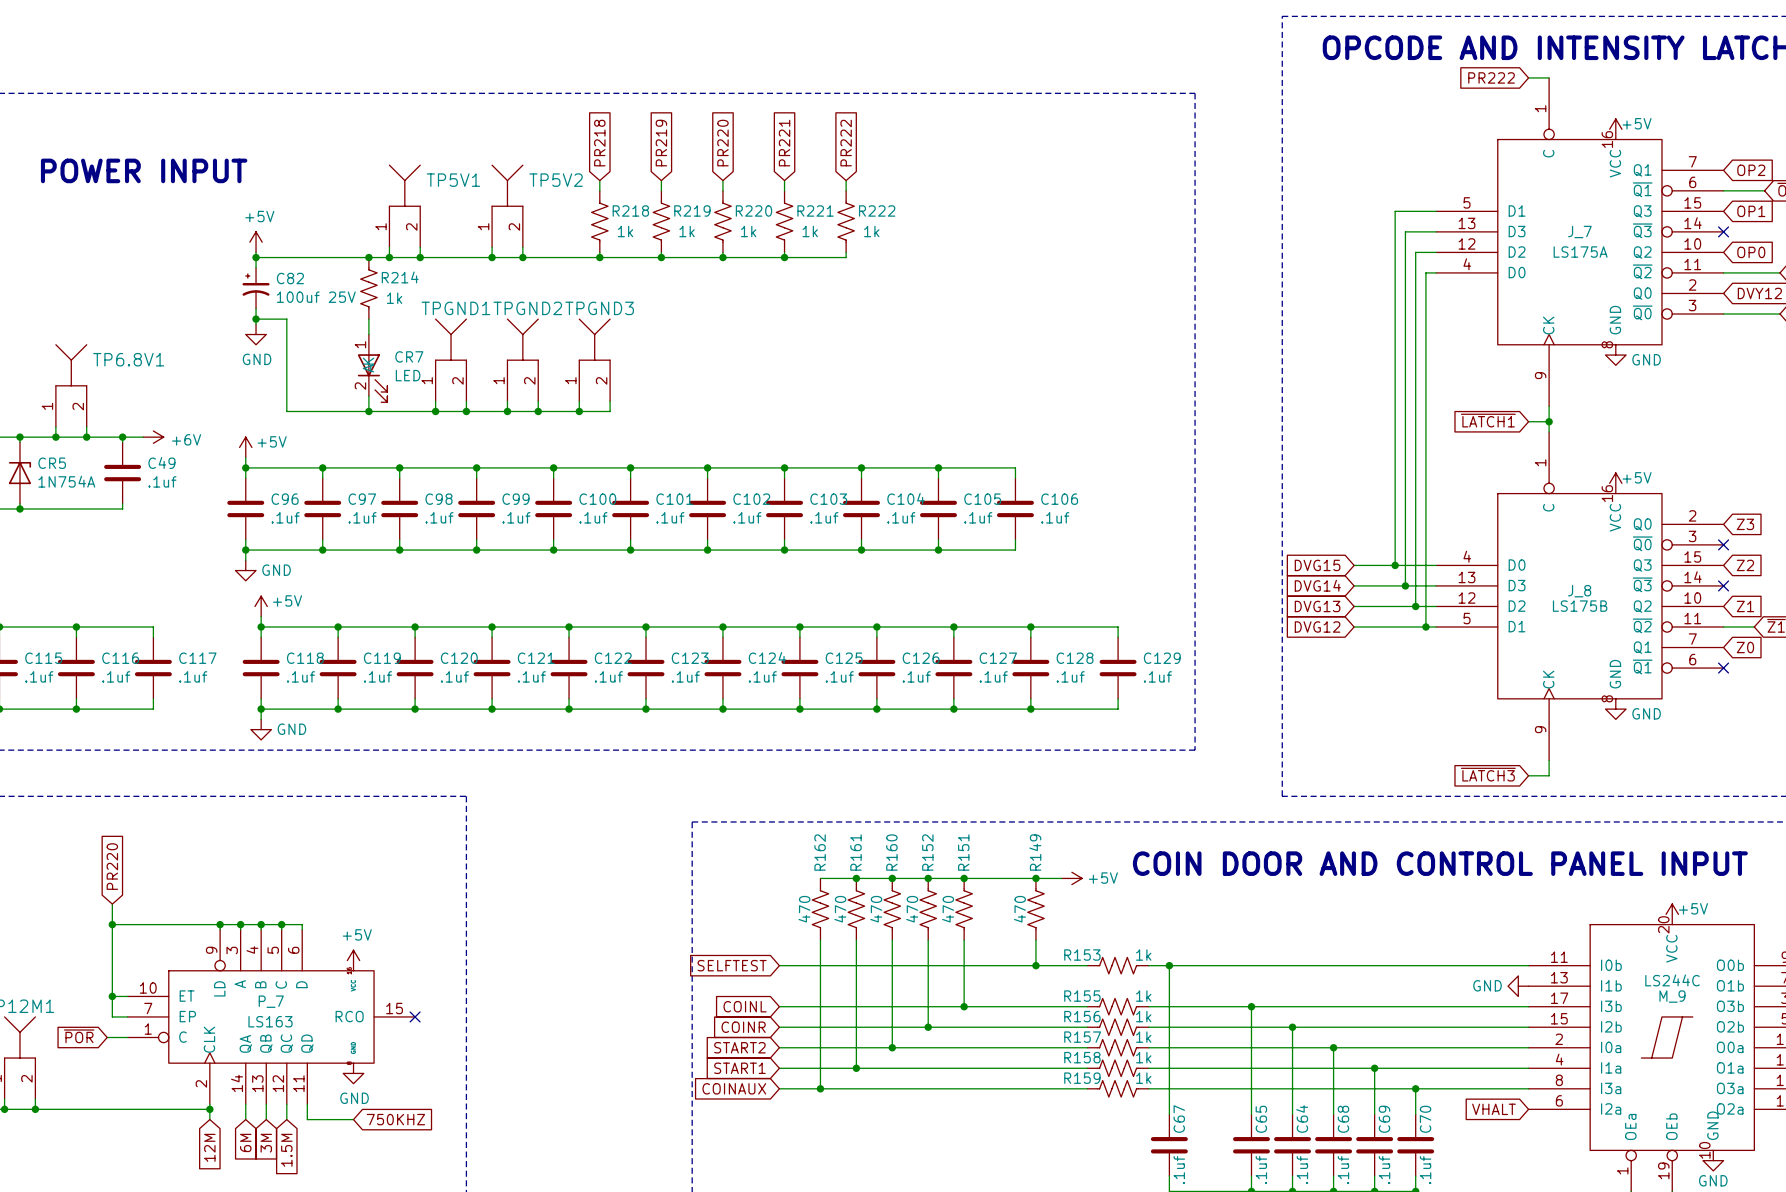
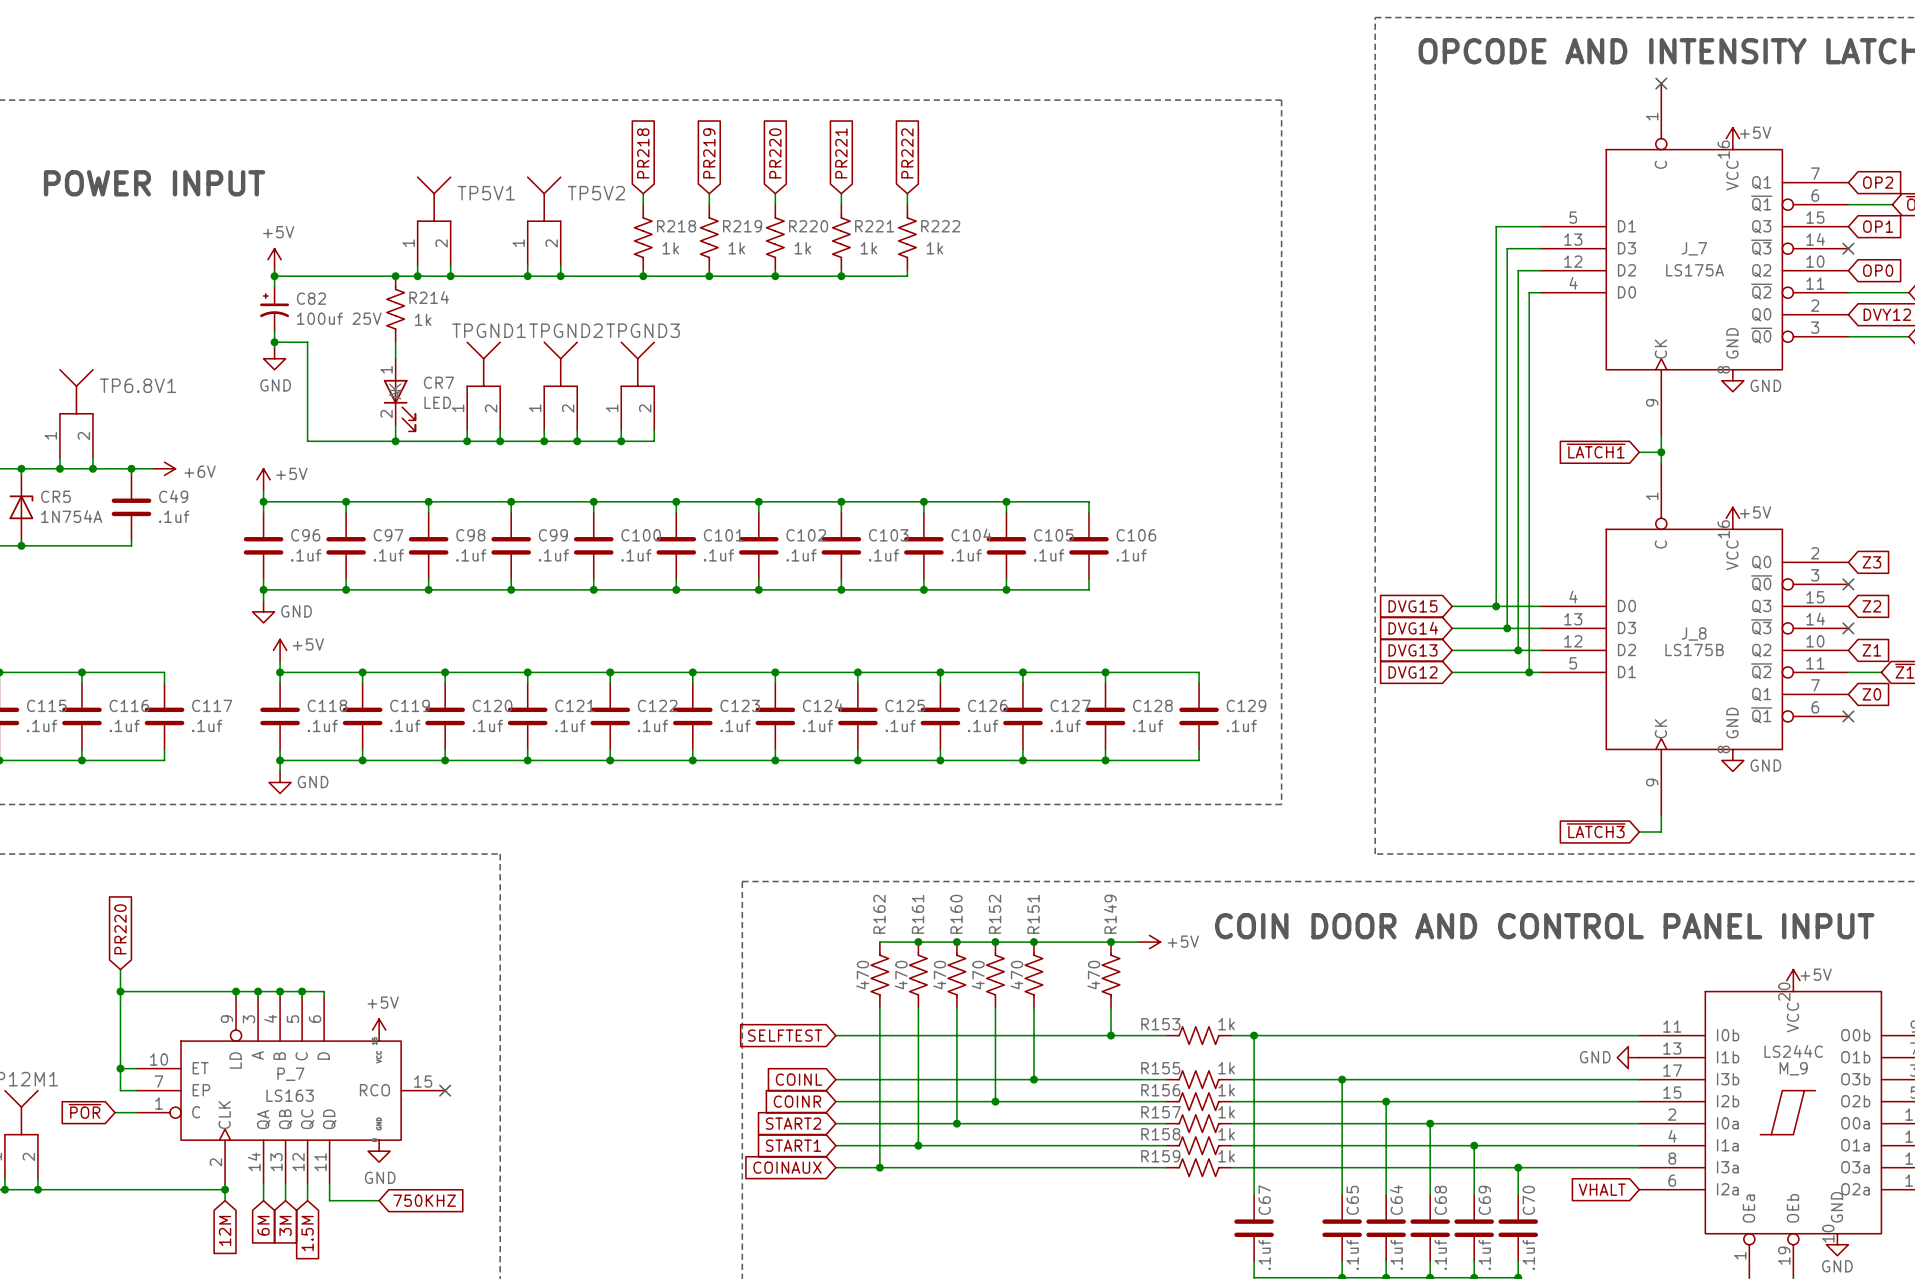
global label: PR222 (1491, 77) -> none
wire: (1528, 77) (1549, 77) -> none
no-connect mark: none -> (1661, 83)

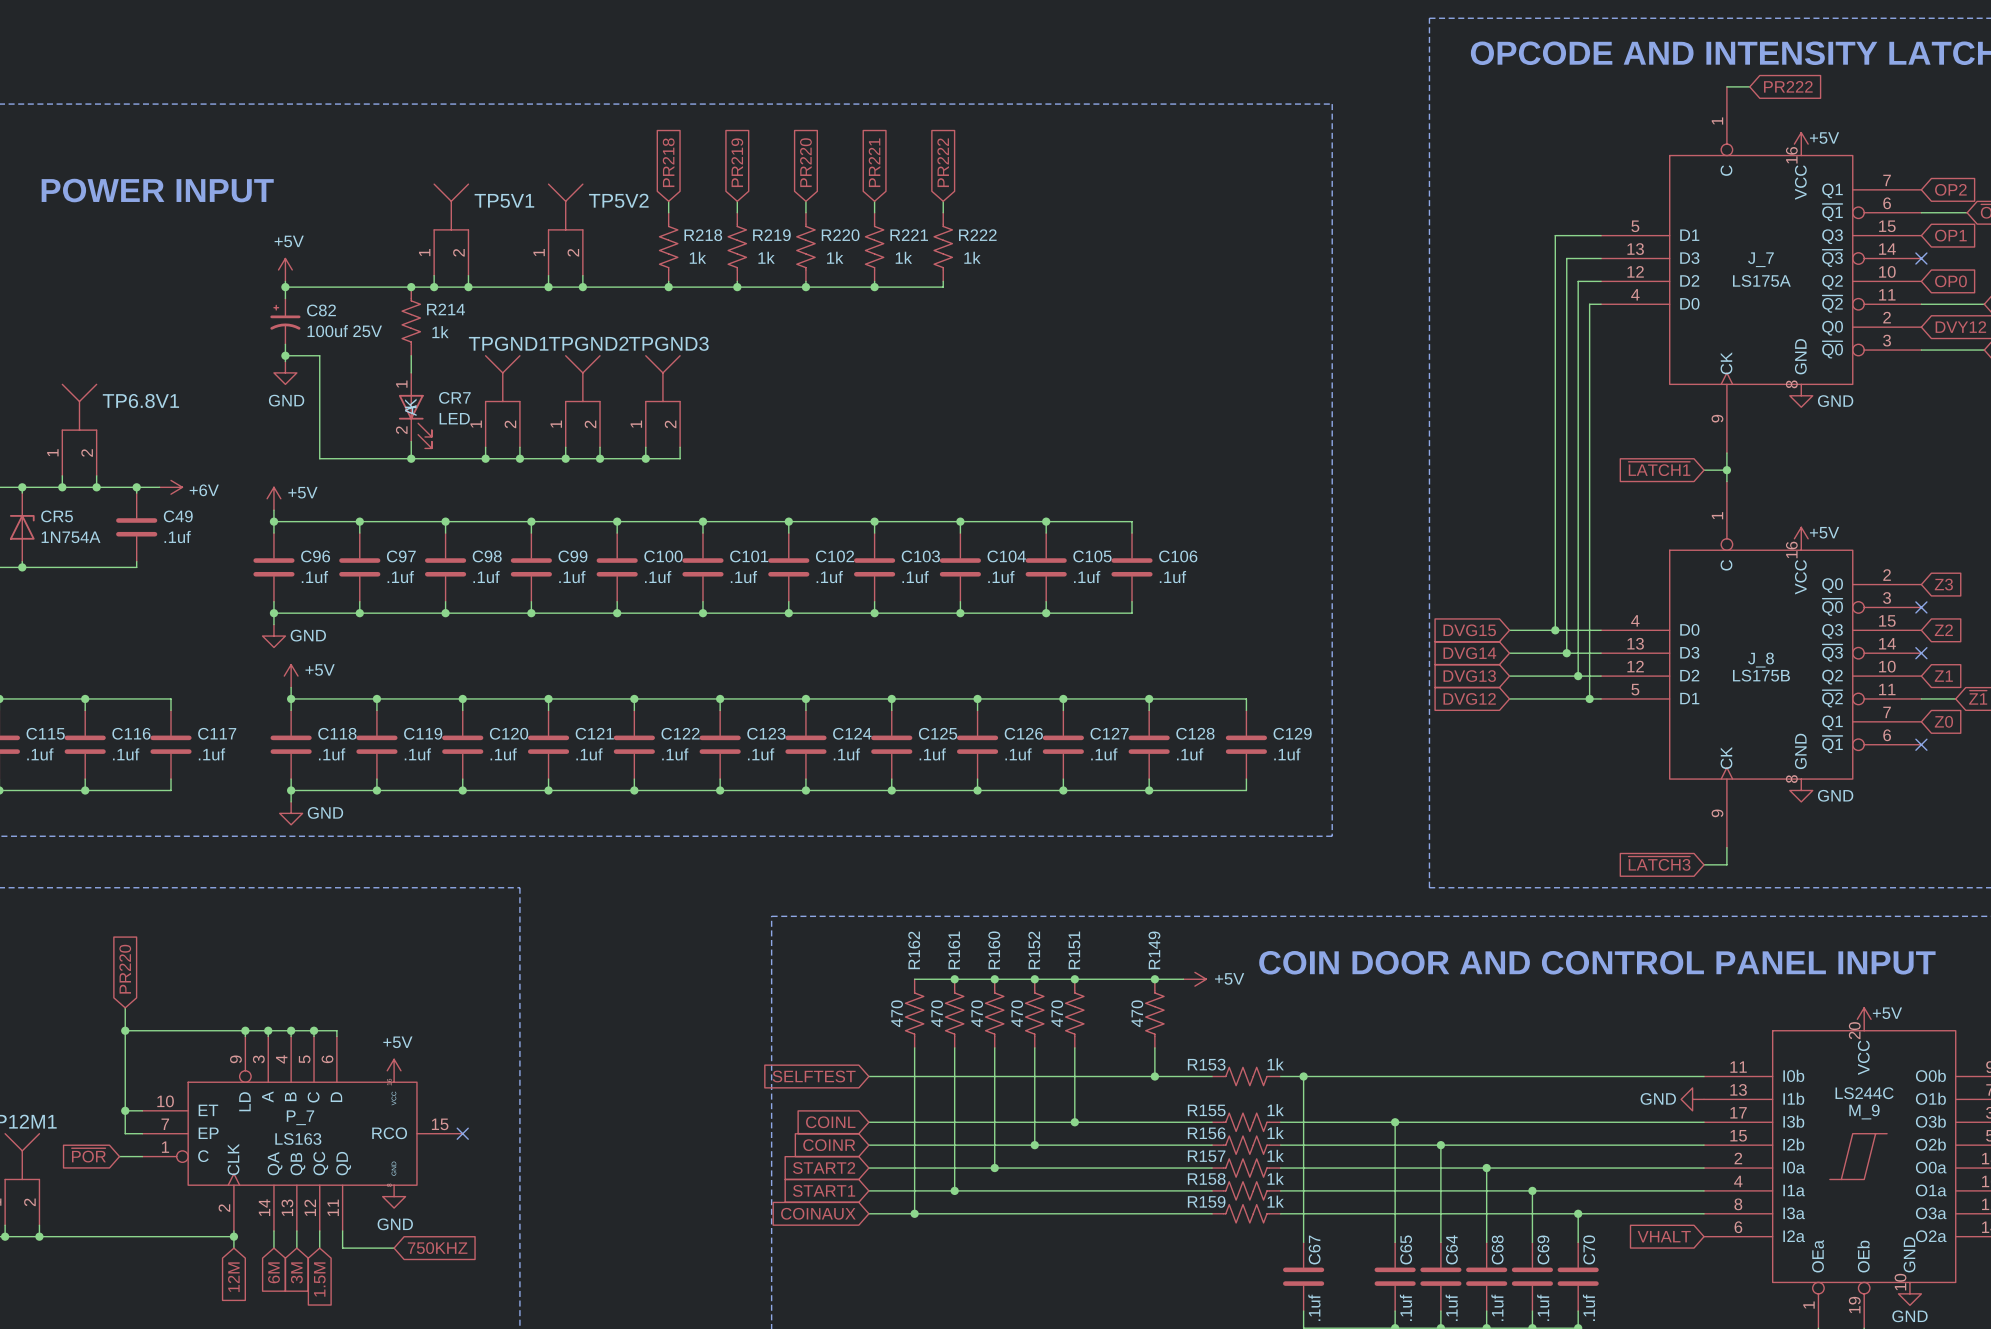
wire: none -> (1726, 86) (1749, 86)
no-connect mark: (1661, 83) -> none
global label: none -> PR222 (1788, 86)

